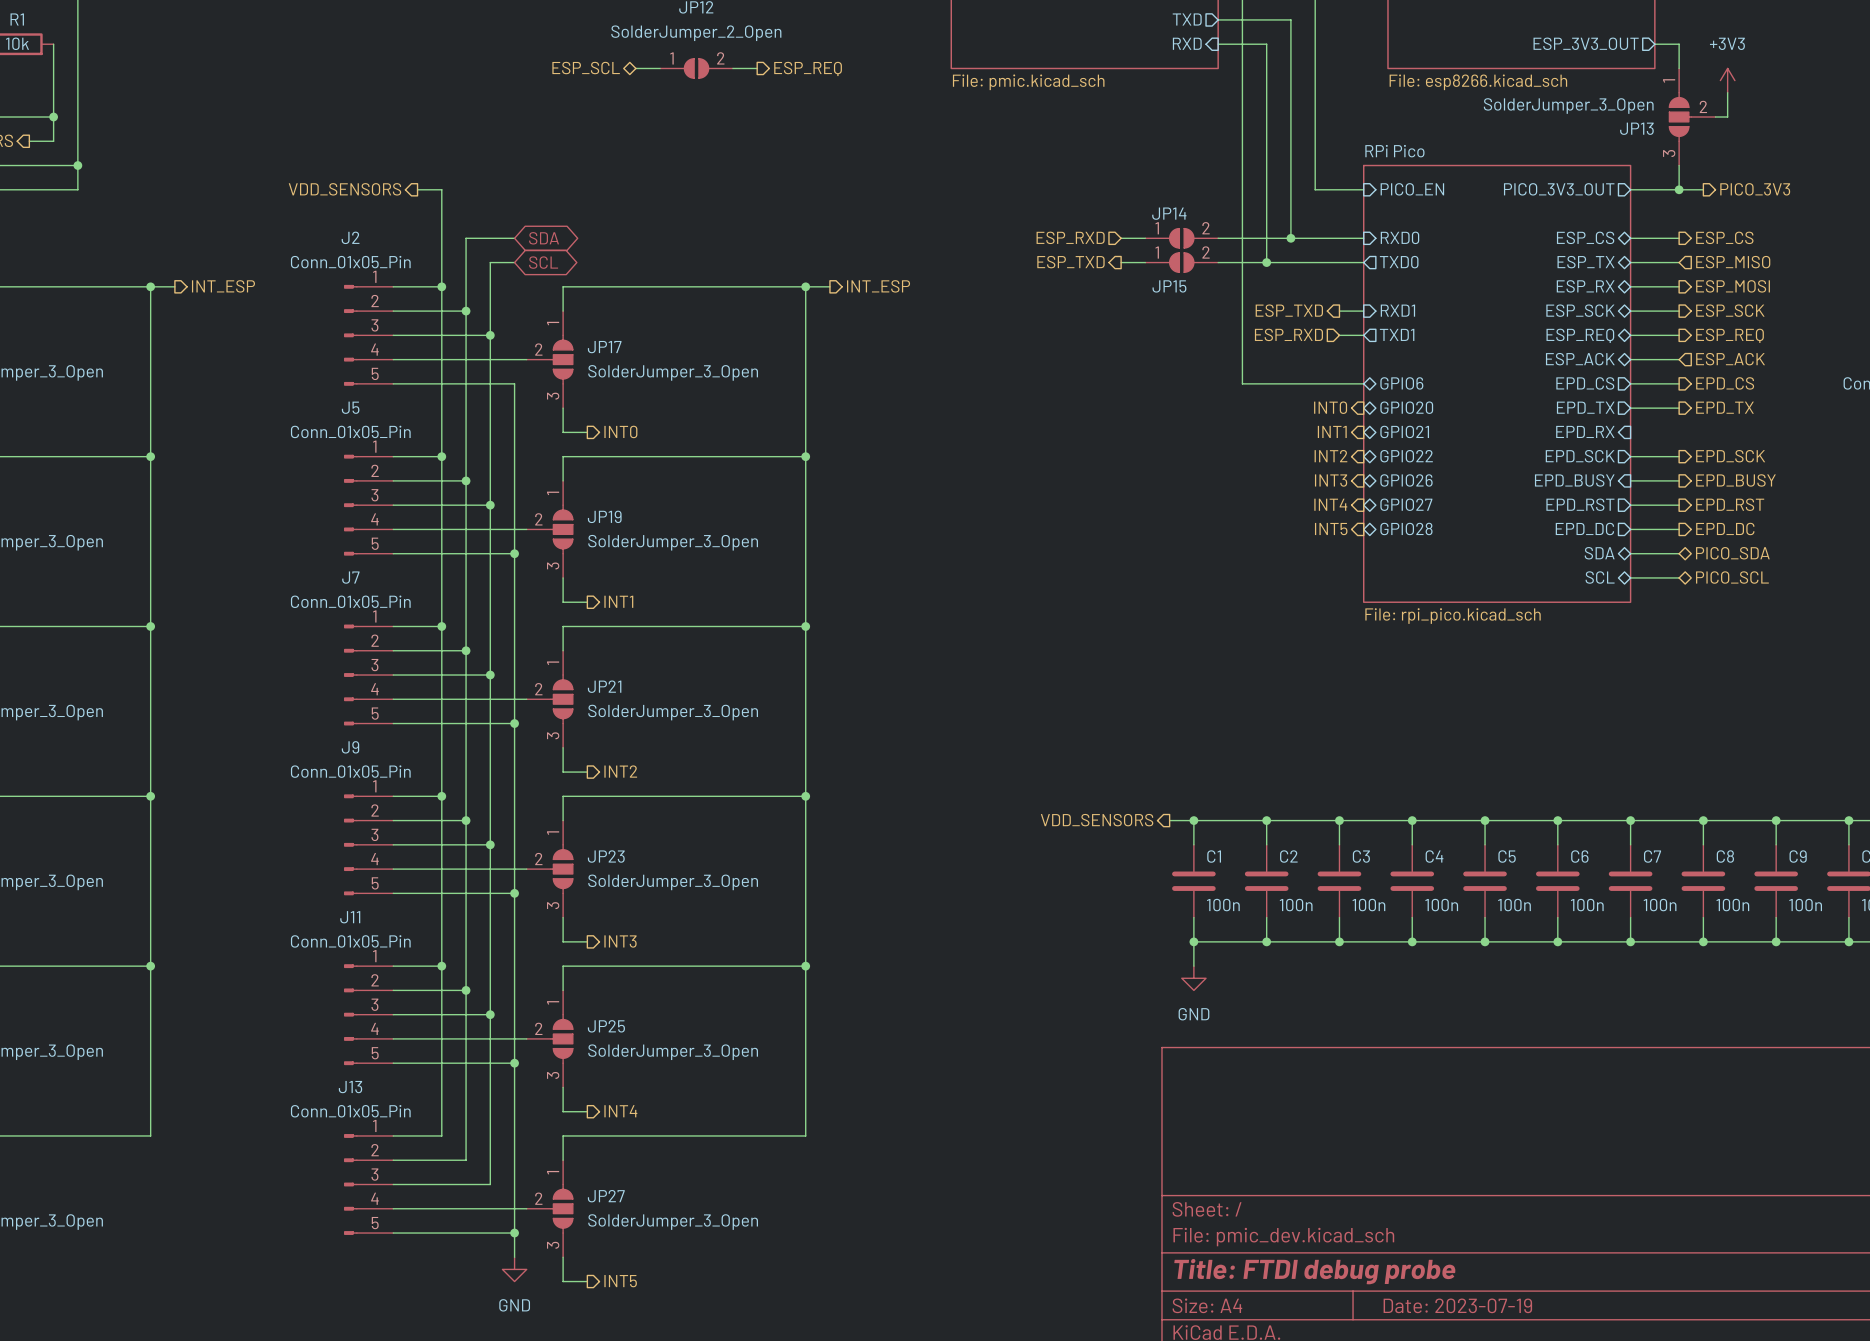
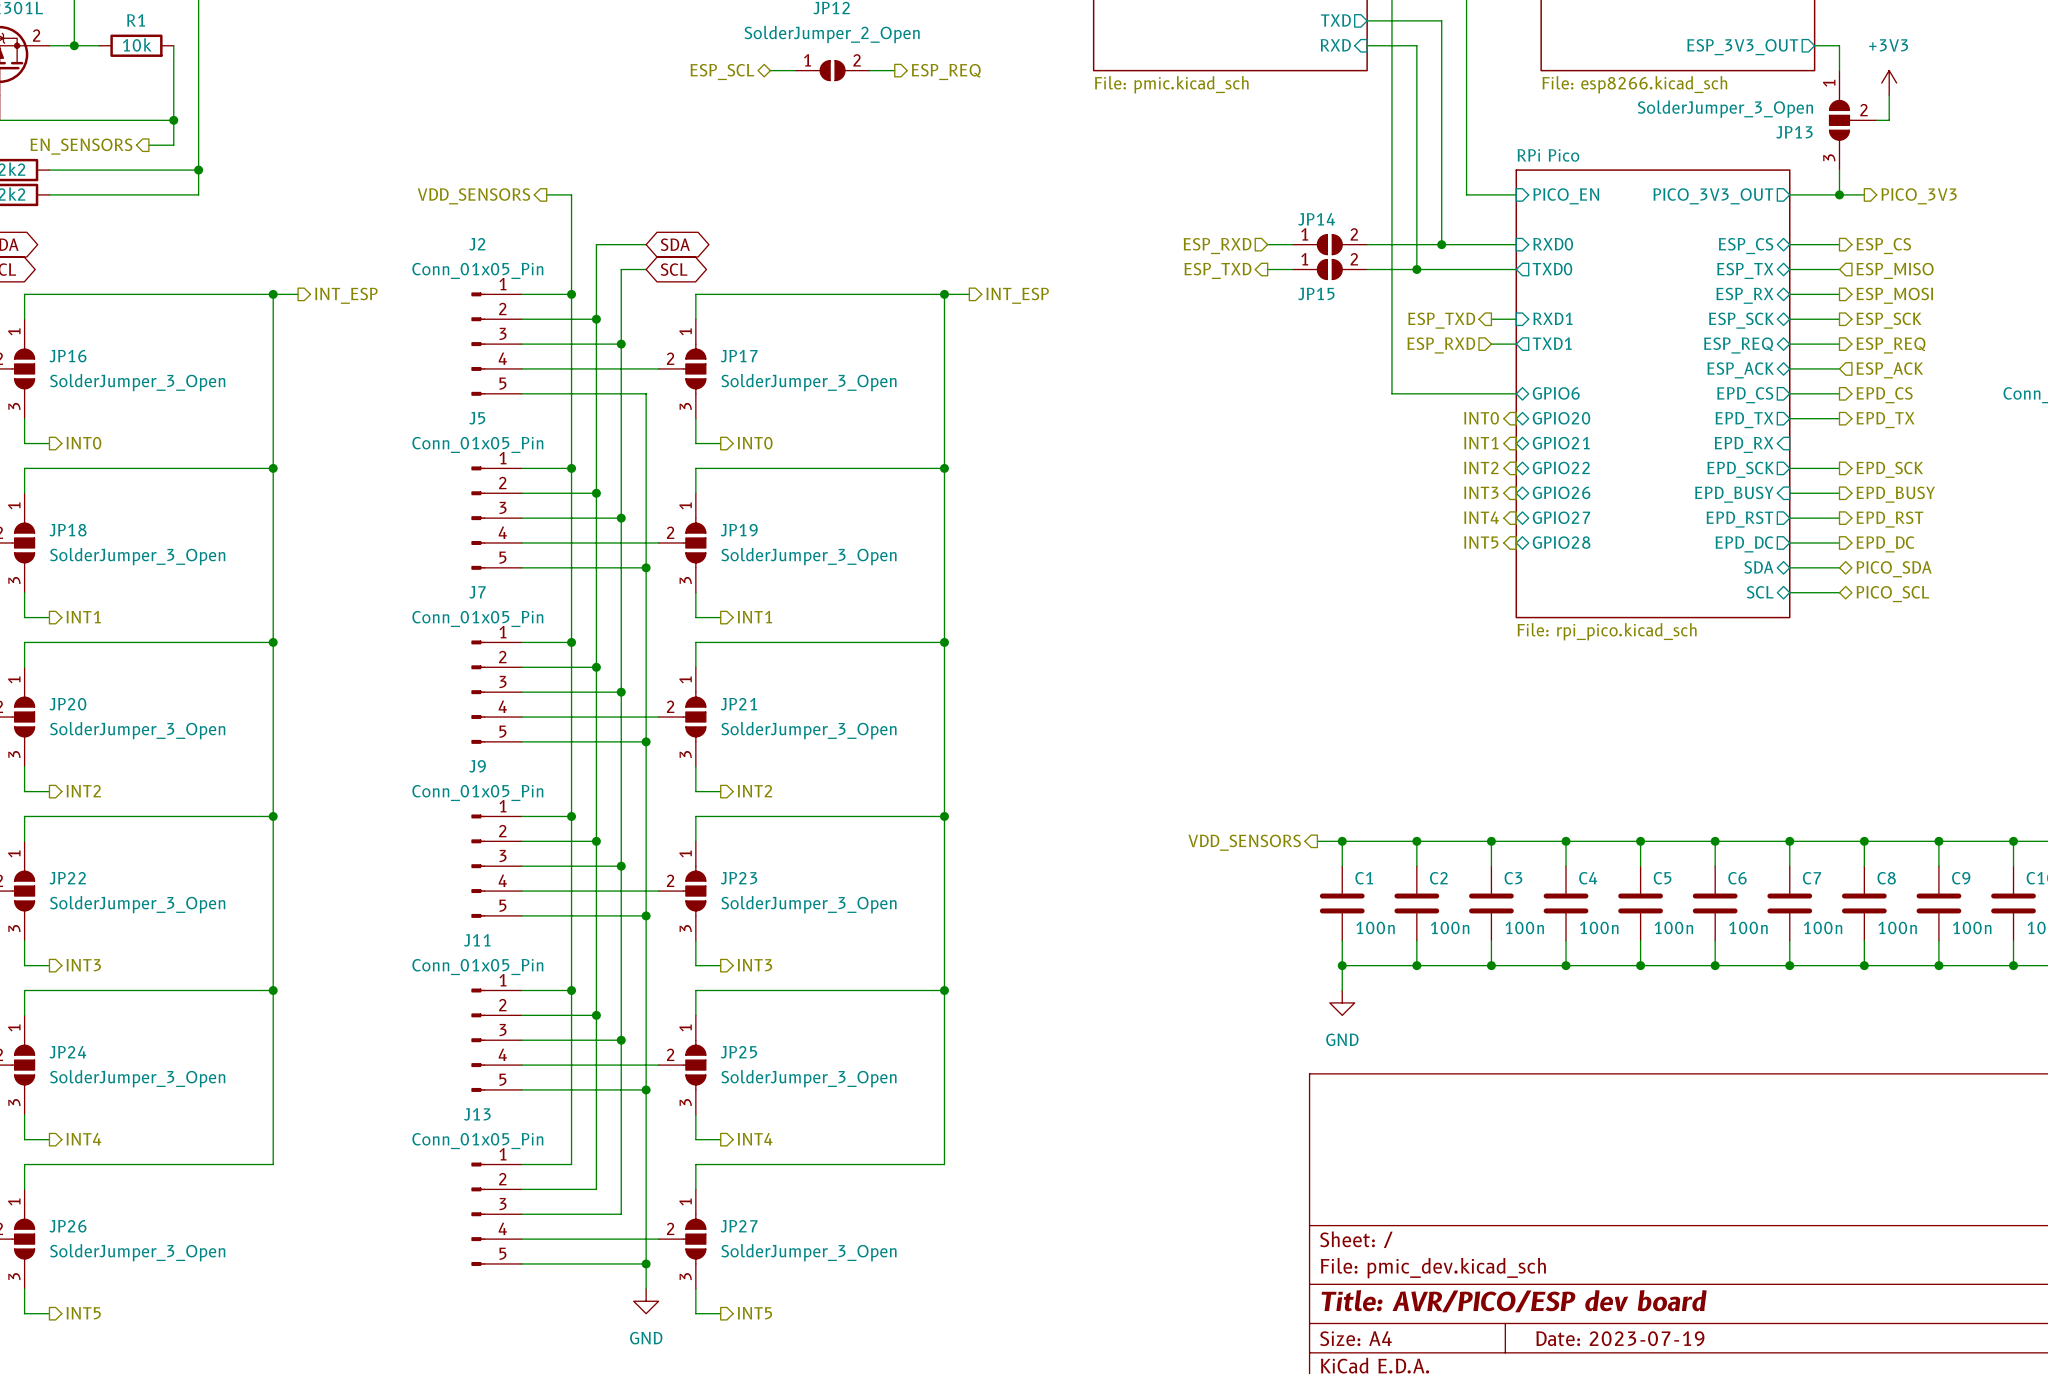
title block: Title: FTDI debug probe (1314, 1271) -> Title: AVR/PICO/ESP dev board (1514, 1301)

